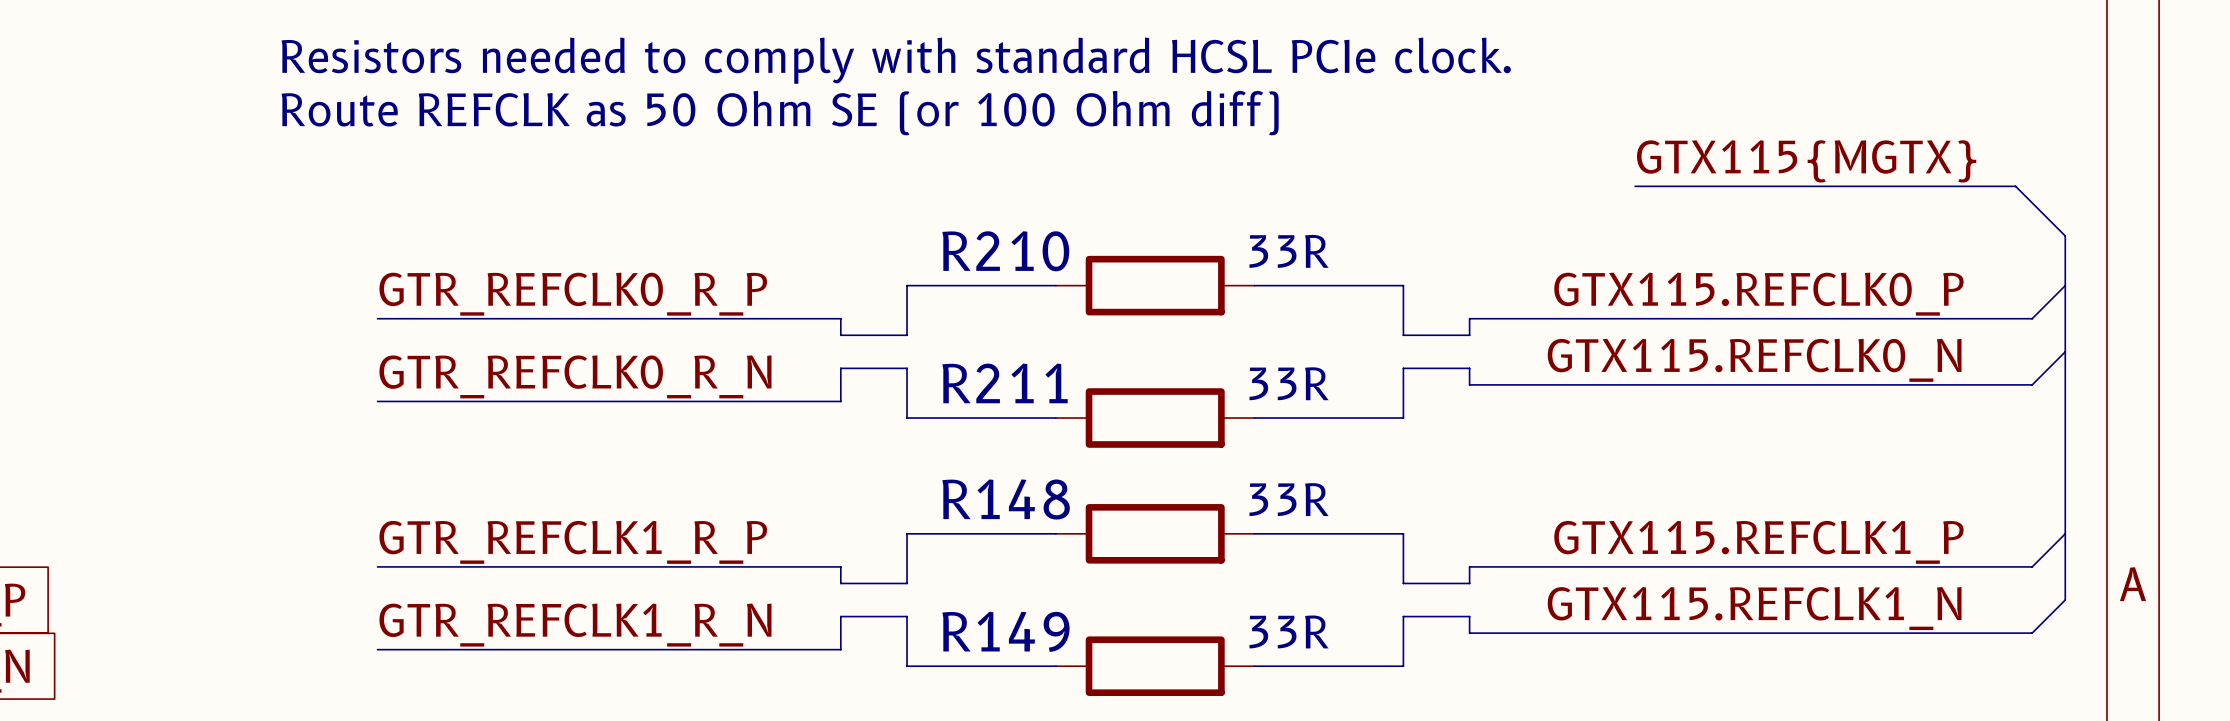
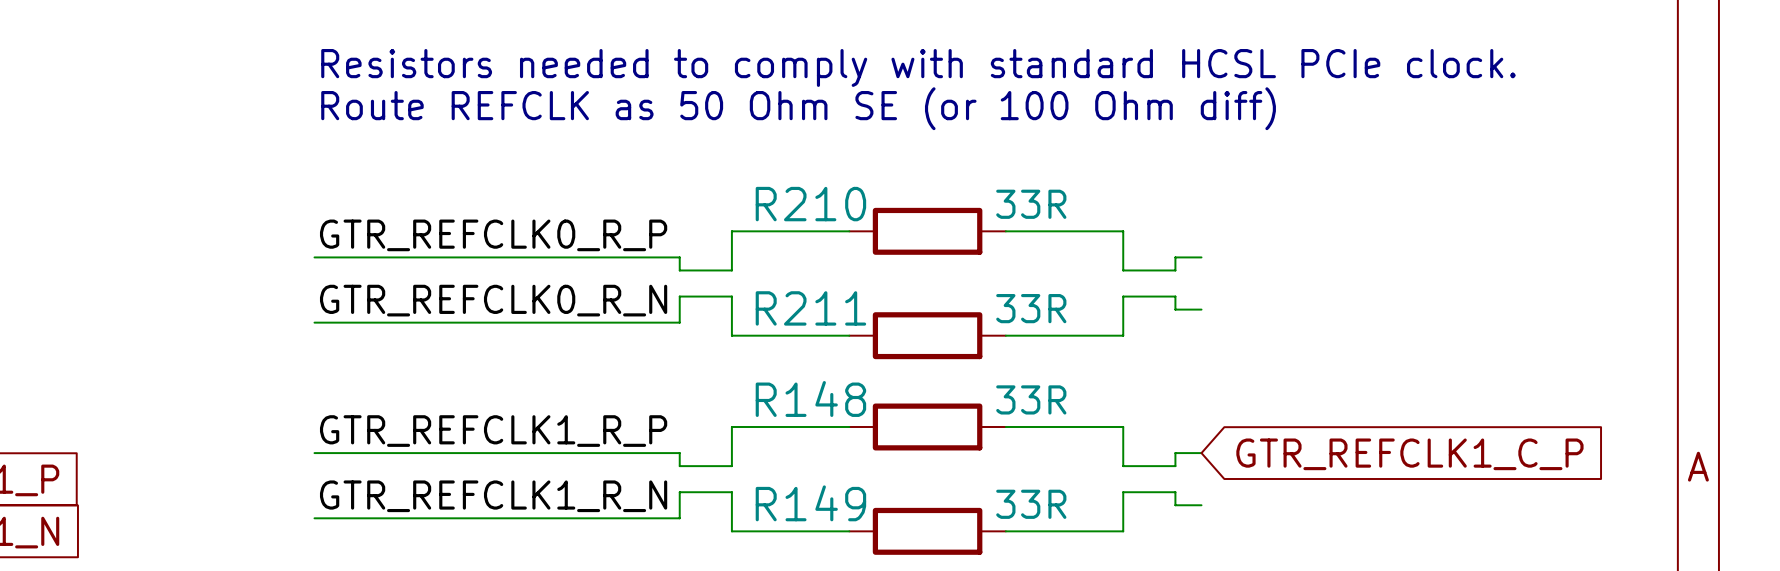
text position: Resistors needed to comply with standard HCSL PCIe clock. (896, 60) -> Resistors needed to comply with standard HCSL PCIe clock. (918, 67)
text position: Route REFCLK as 50 Ohm SE (or 100 Ohm diff) (780, 113) -> Route REFCLK as 50 Ohm SE (or 100 Ohm diff) (798, 108)
label: GTX115{MGTX} (1806, 161) -> none
bus: (1635, 186) (2015, 186) (2065, 235) (2065, 600) -> none
wire: (2065, 285) (2032, 318) (1502, 318) -> none
label: GTX115.REFCLK0_P (1758, 294) -> none
wire: (2065, 351) (2032, 384) (1502, 384) -> none
label: GTX115.REFCLK0_N (1754, 360) -> none
wire: (2065, 533) (2032, 566) (1502, 566) -> none
label: GTX115.REFCLK1_P (1758, 542) -> none
global label: none -> GTR_REFCLK1_C_P (1409, 454)
wire: (2065, 600) (2032, 633) (1502, 633) -> none
label: GTX115.REFCLK1_N (1754, 608) -> none

